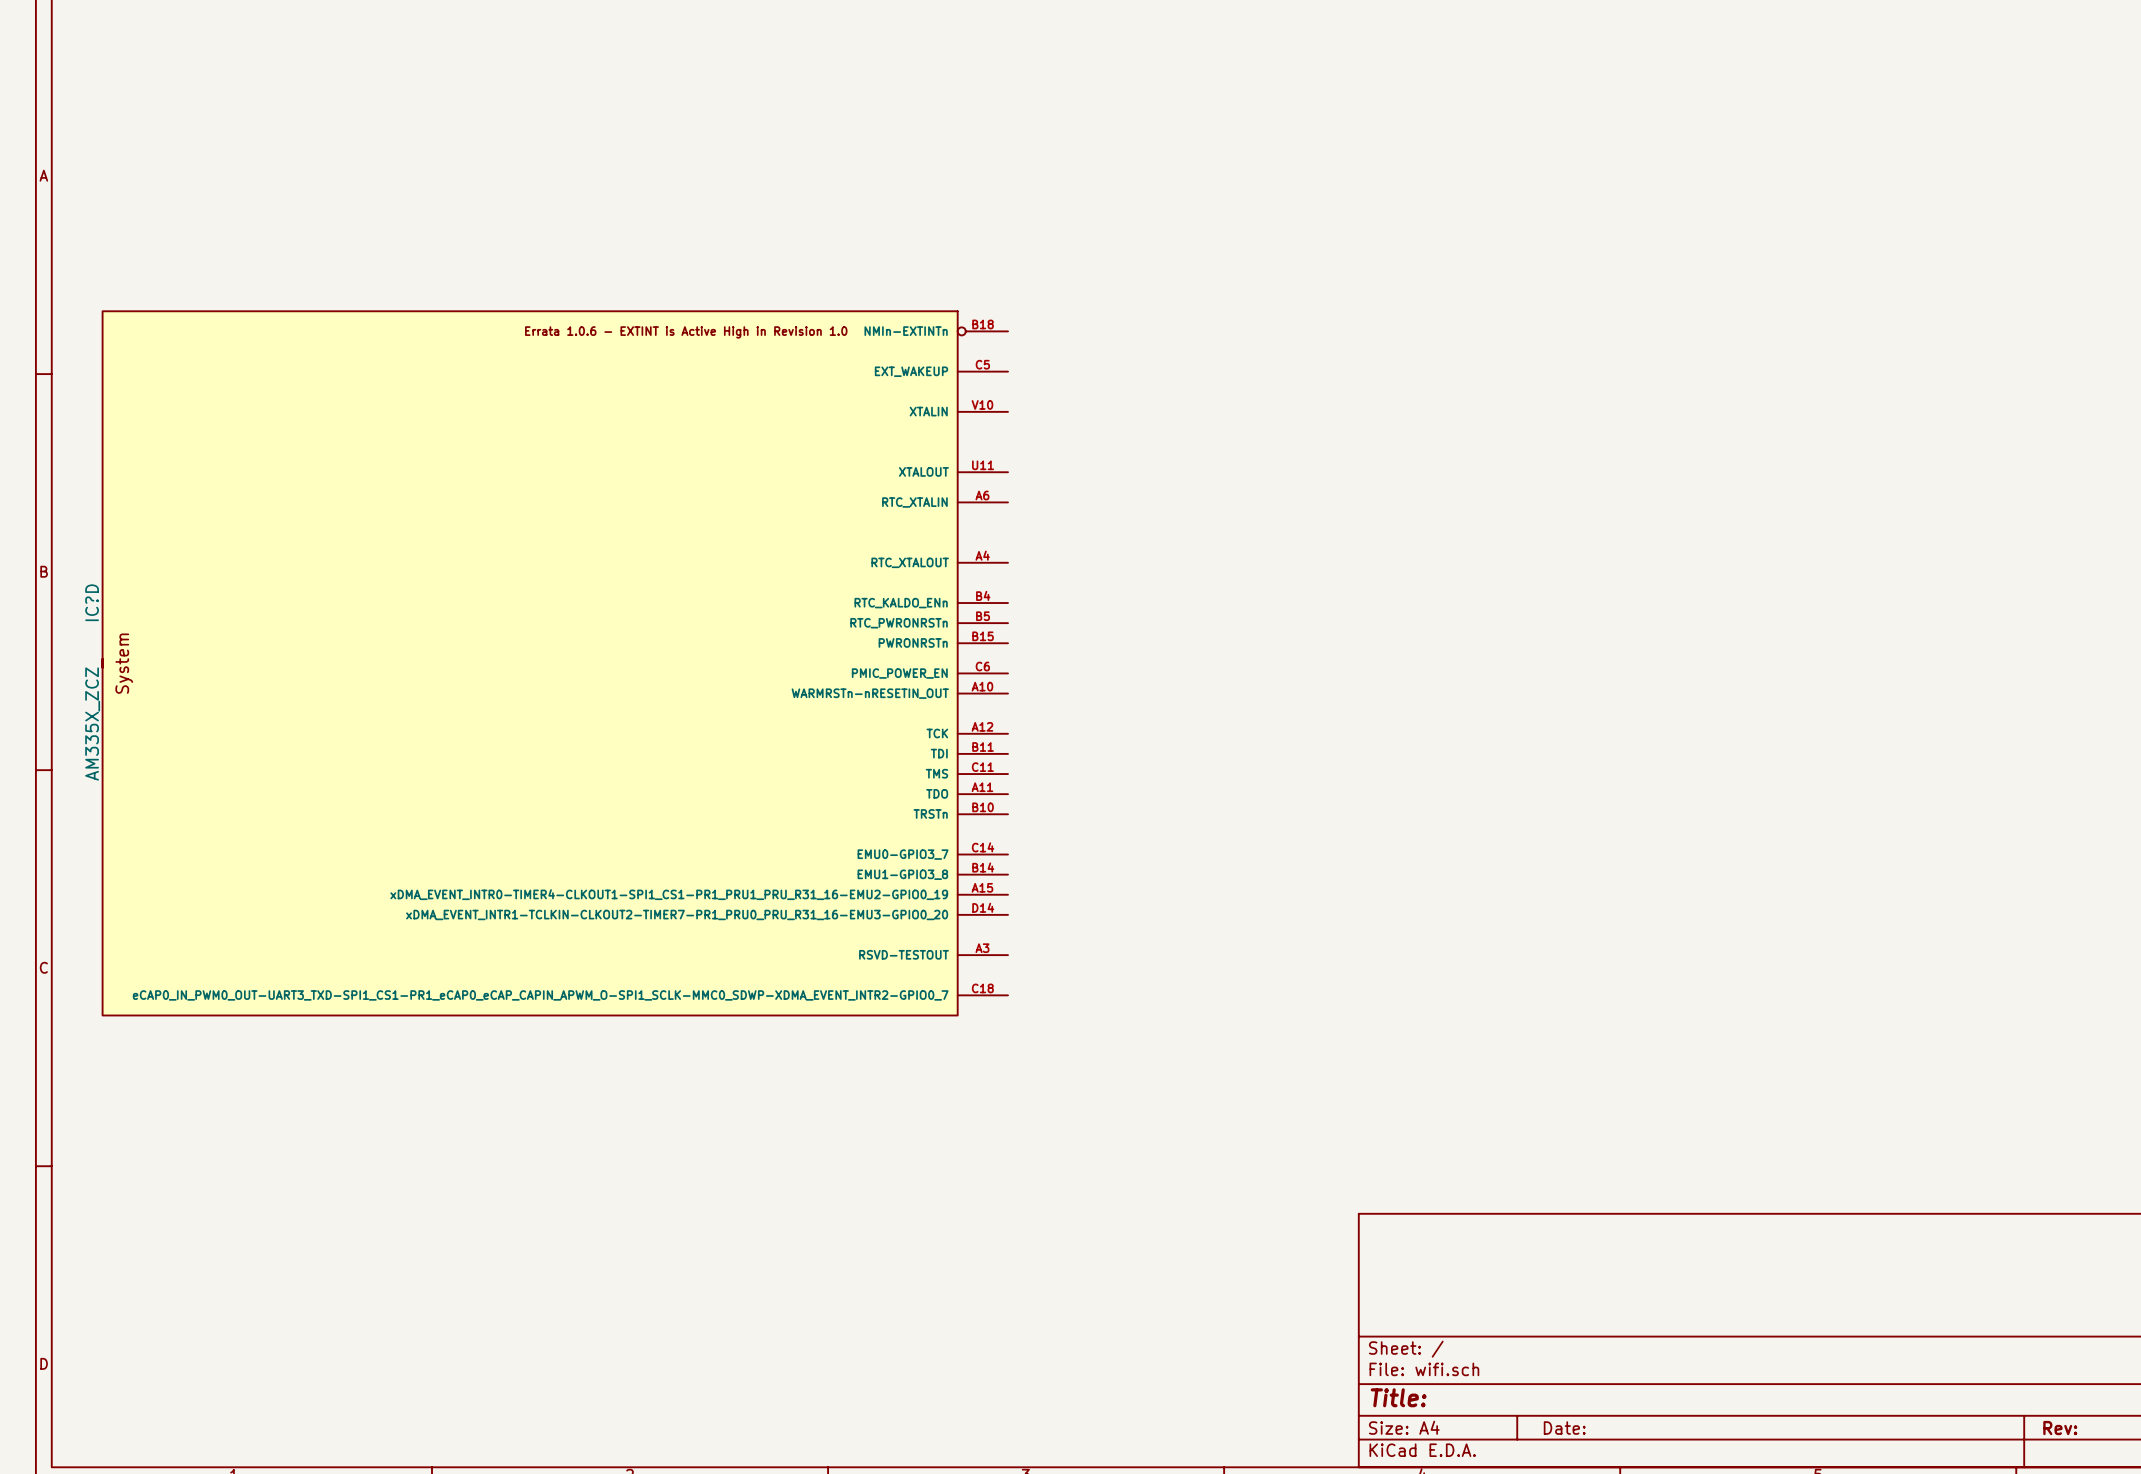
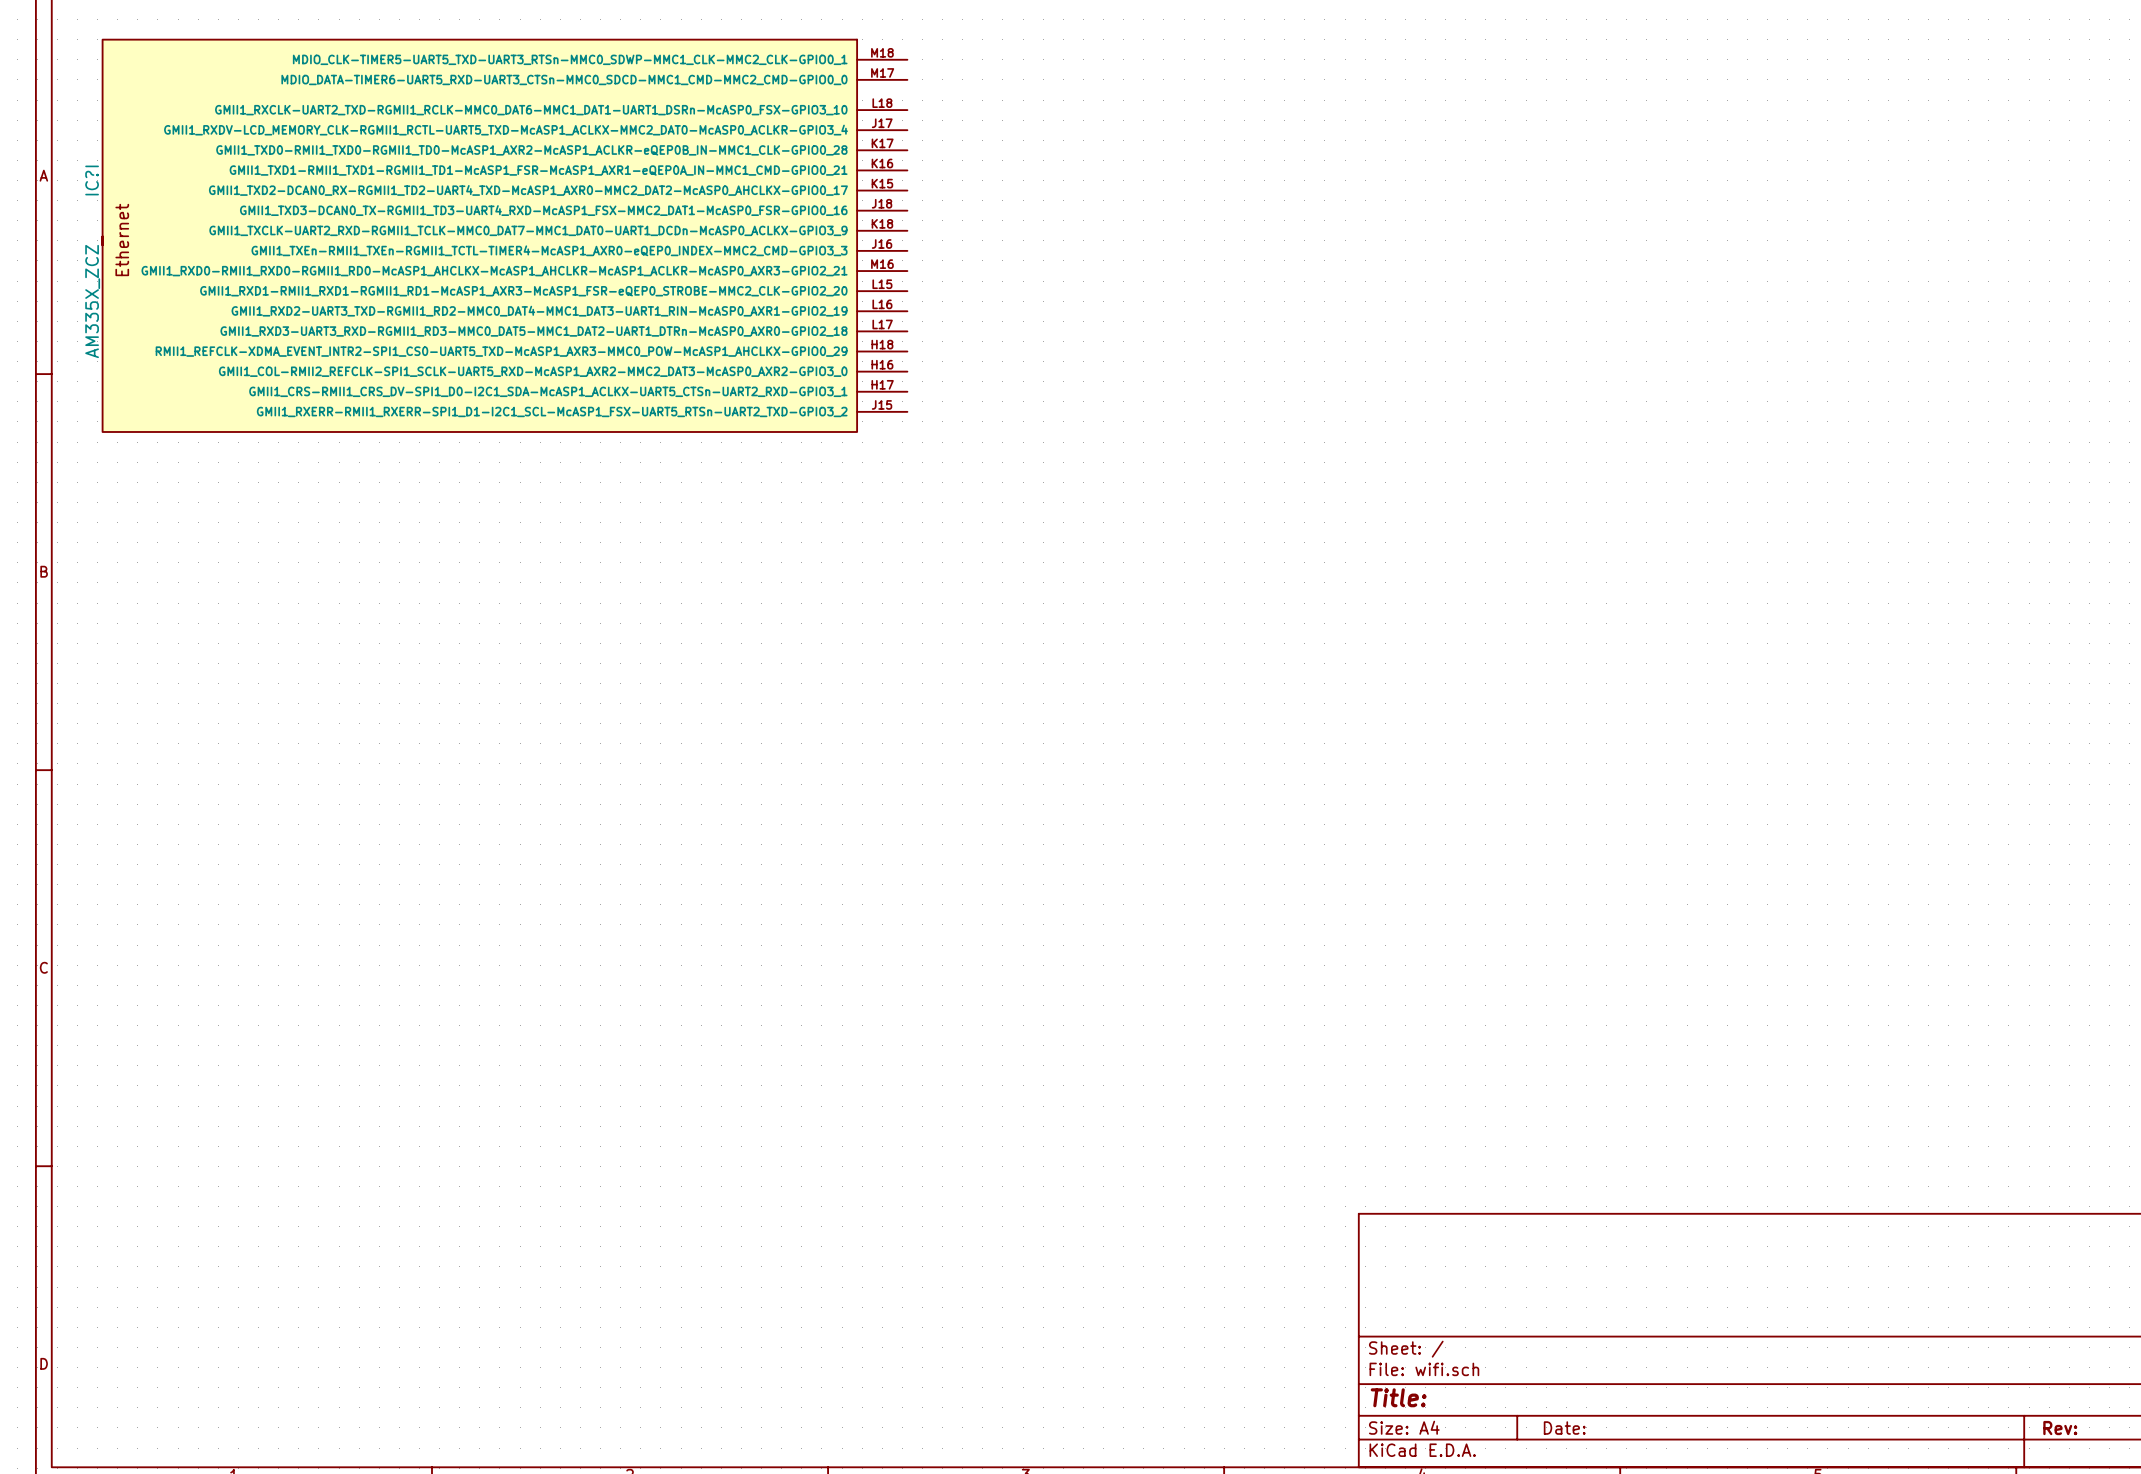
IC?I: none -> AM335X_ZCZ (504, 235)
IC?D: AM335X_ZCZ (555, 663) -> none

